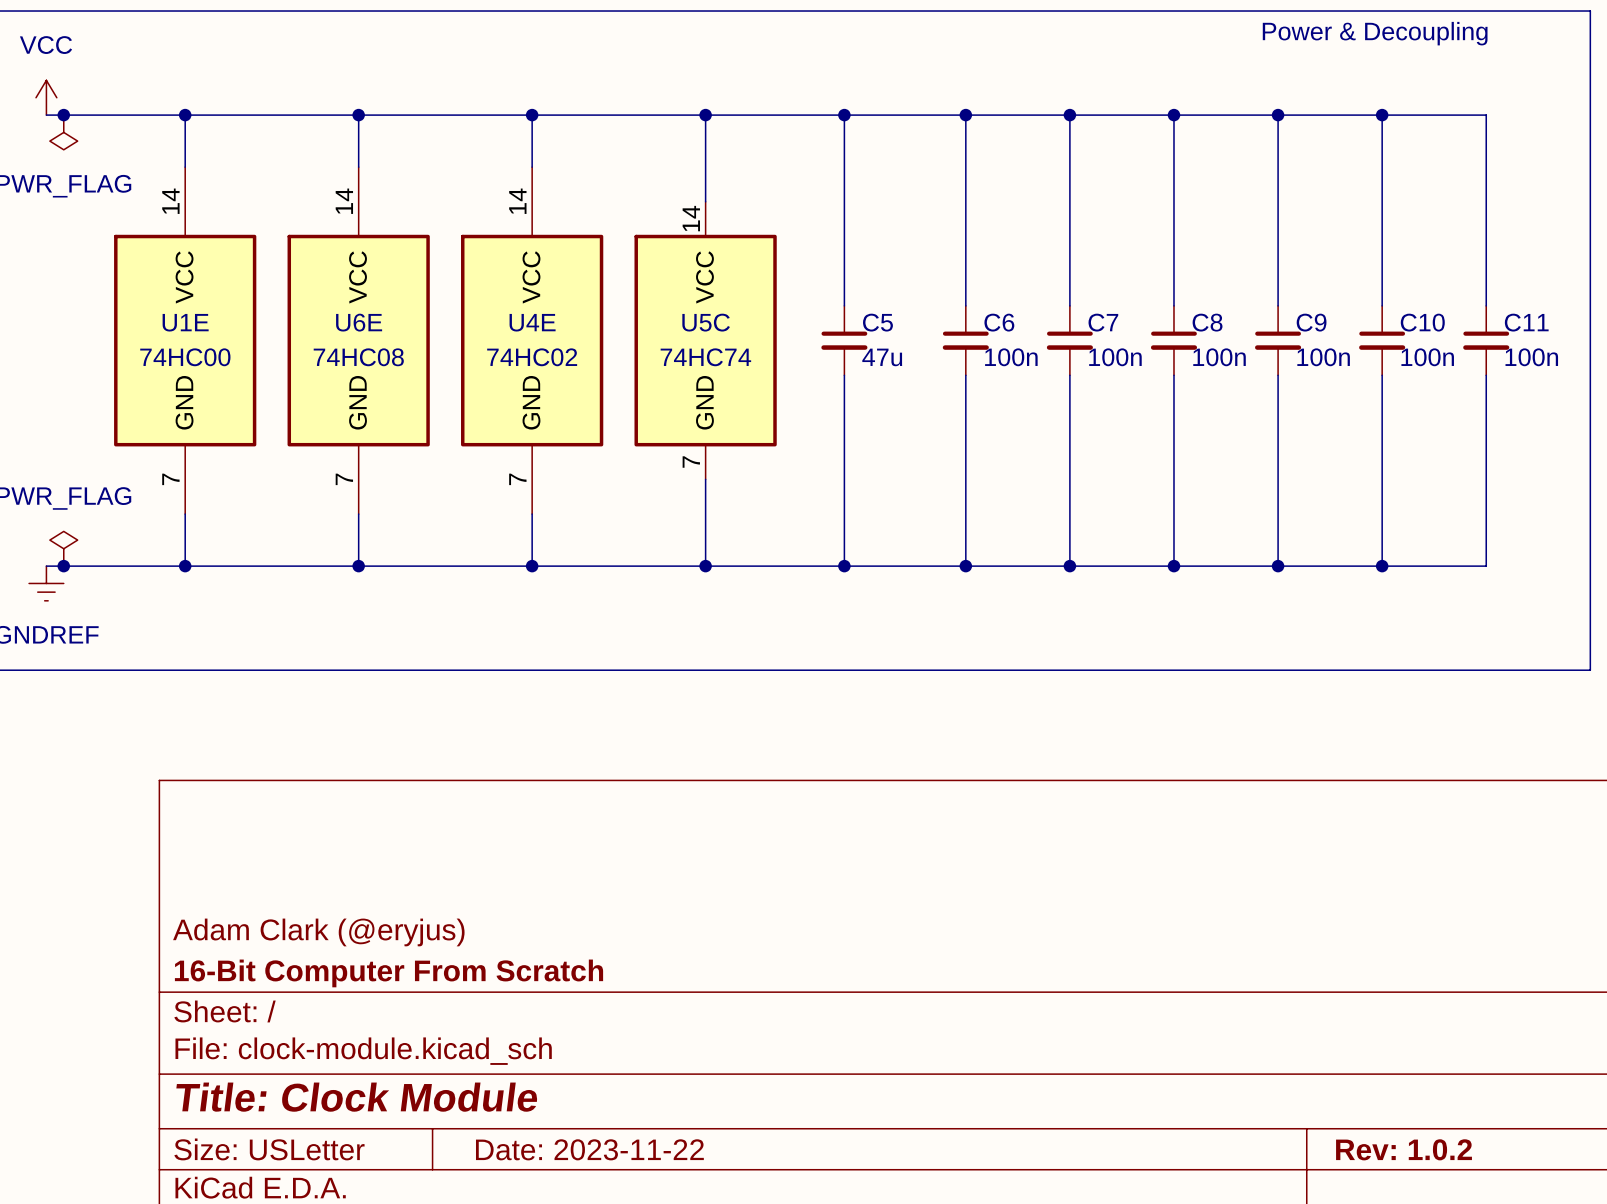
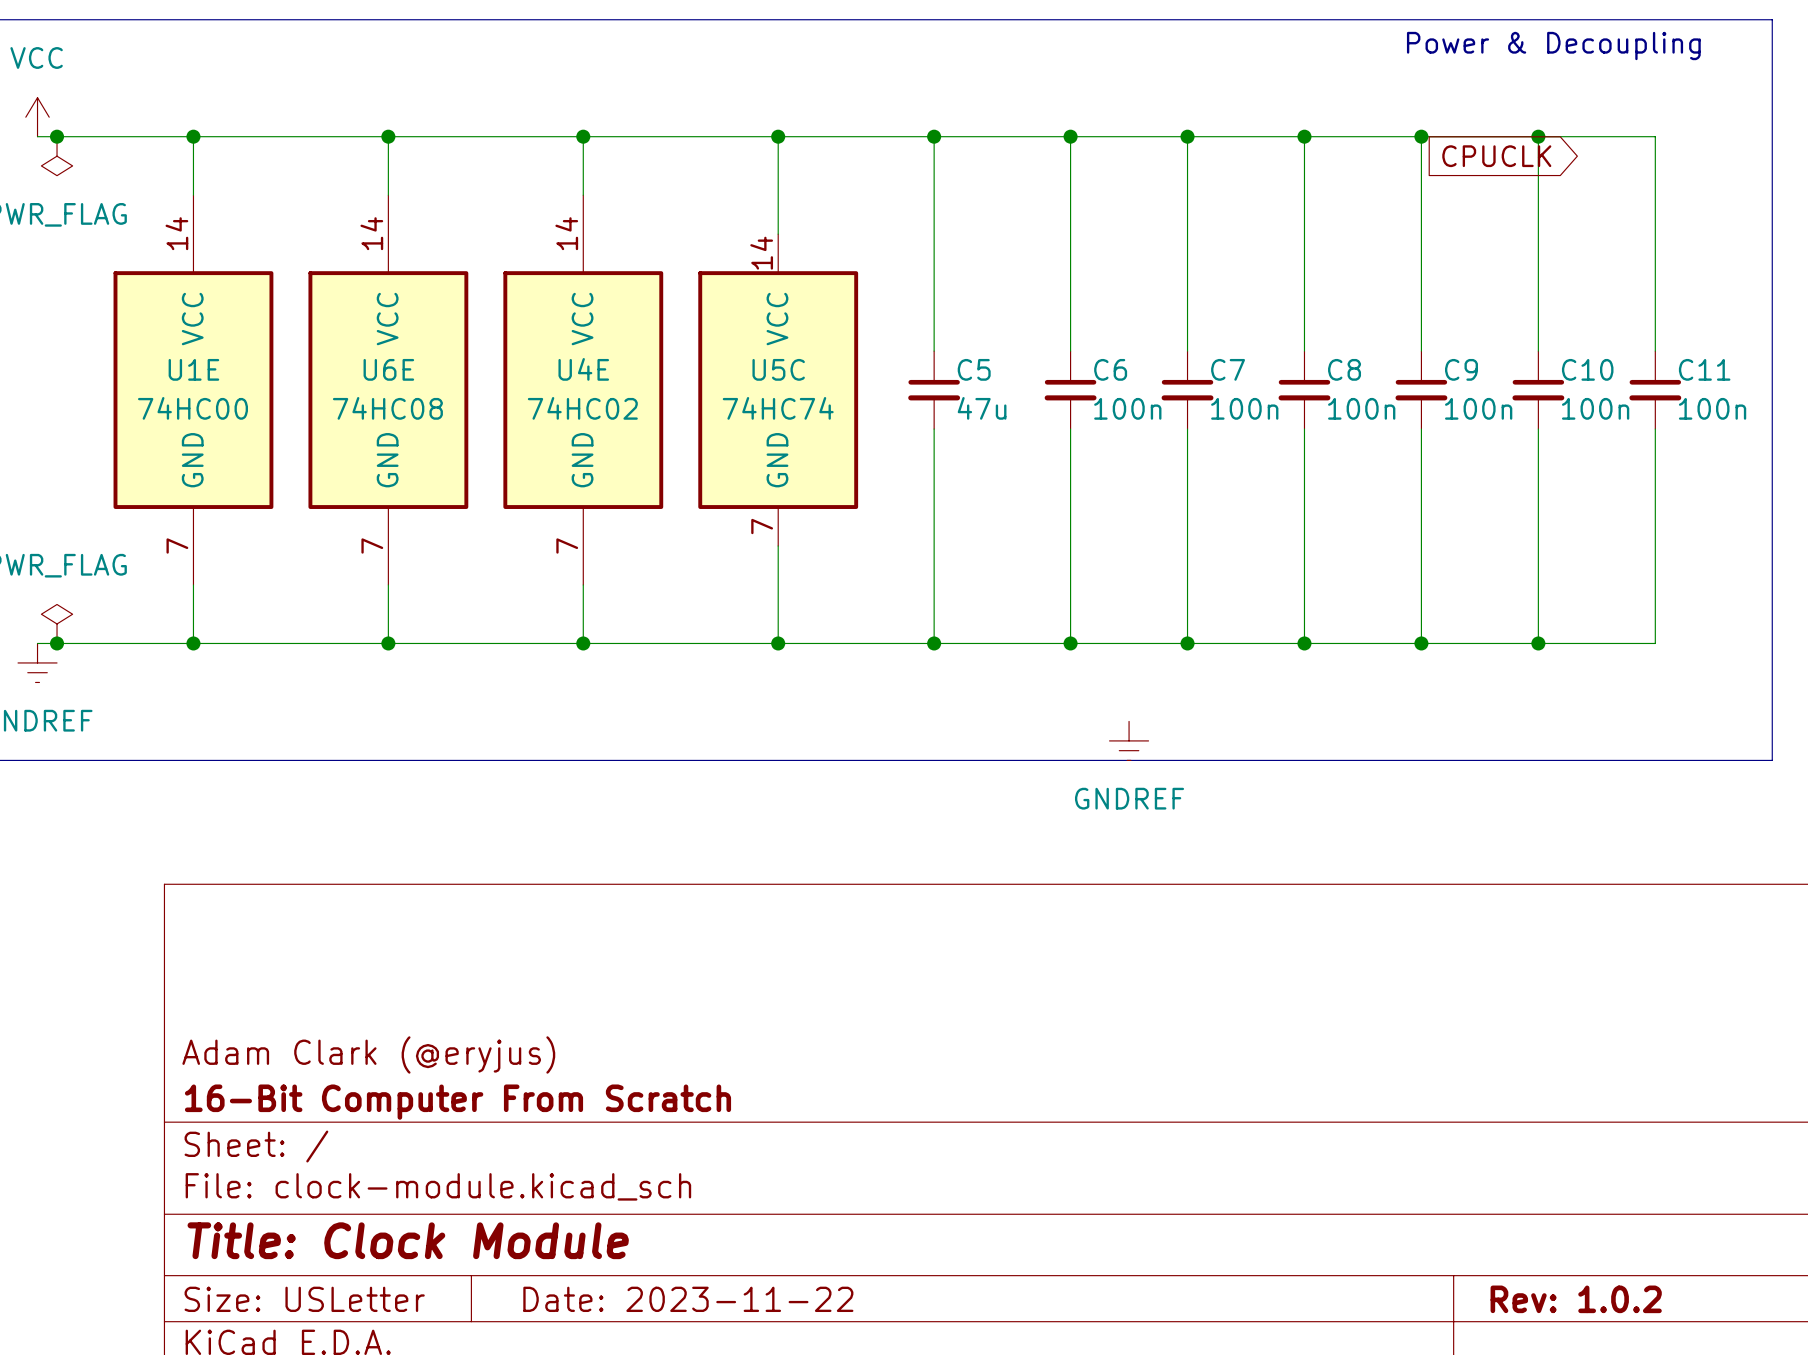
global label: none -> CPUCLK (1496, 156)
power symbol: none -> GNDREF (1129, 740)

